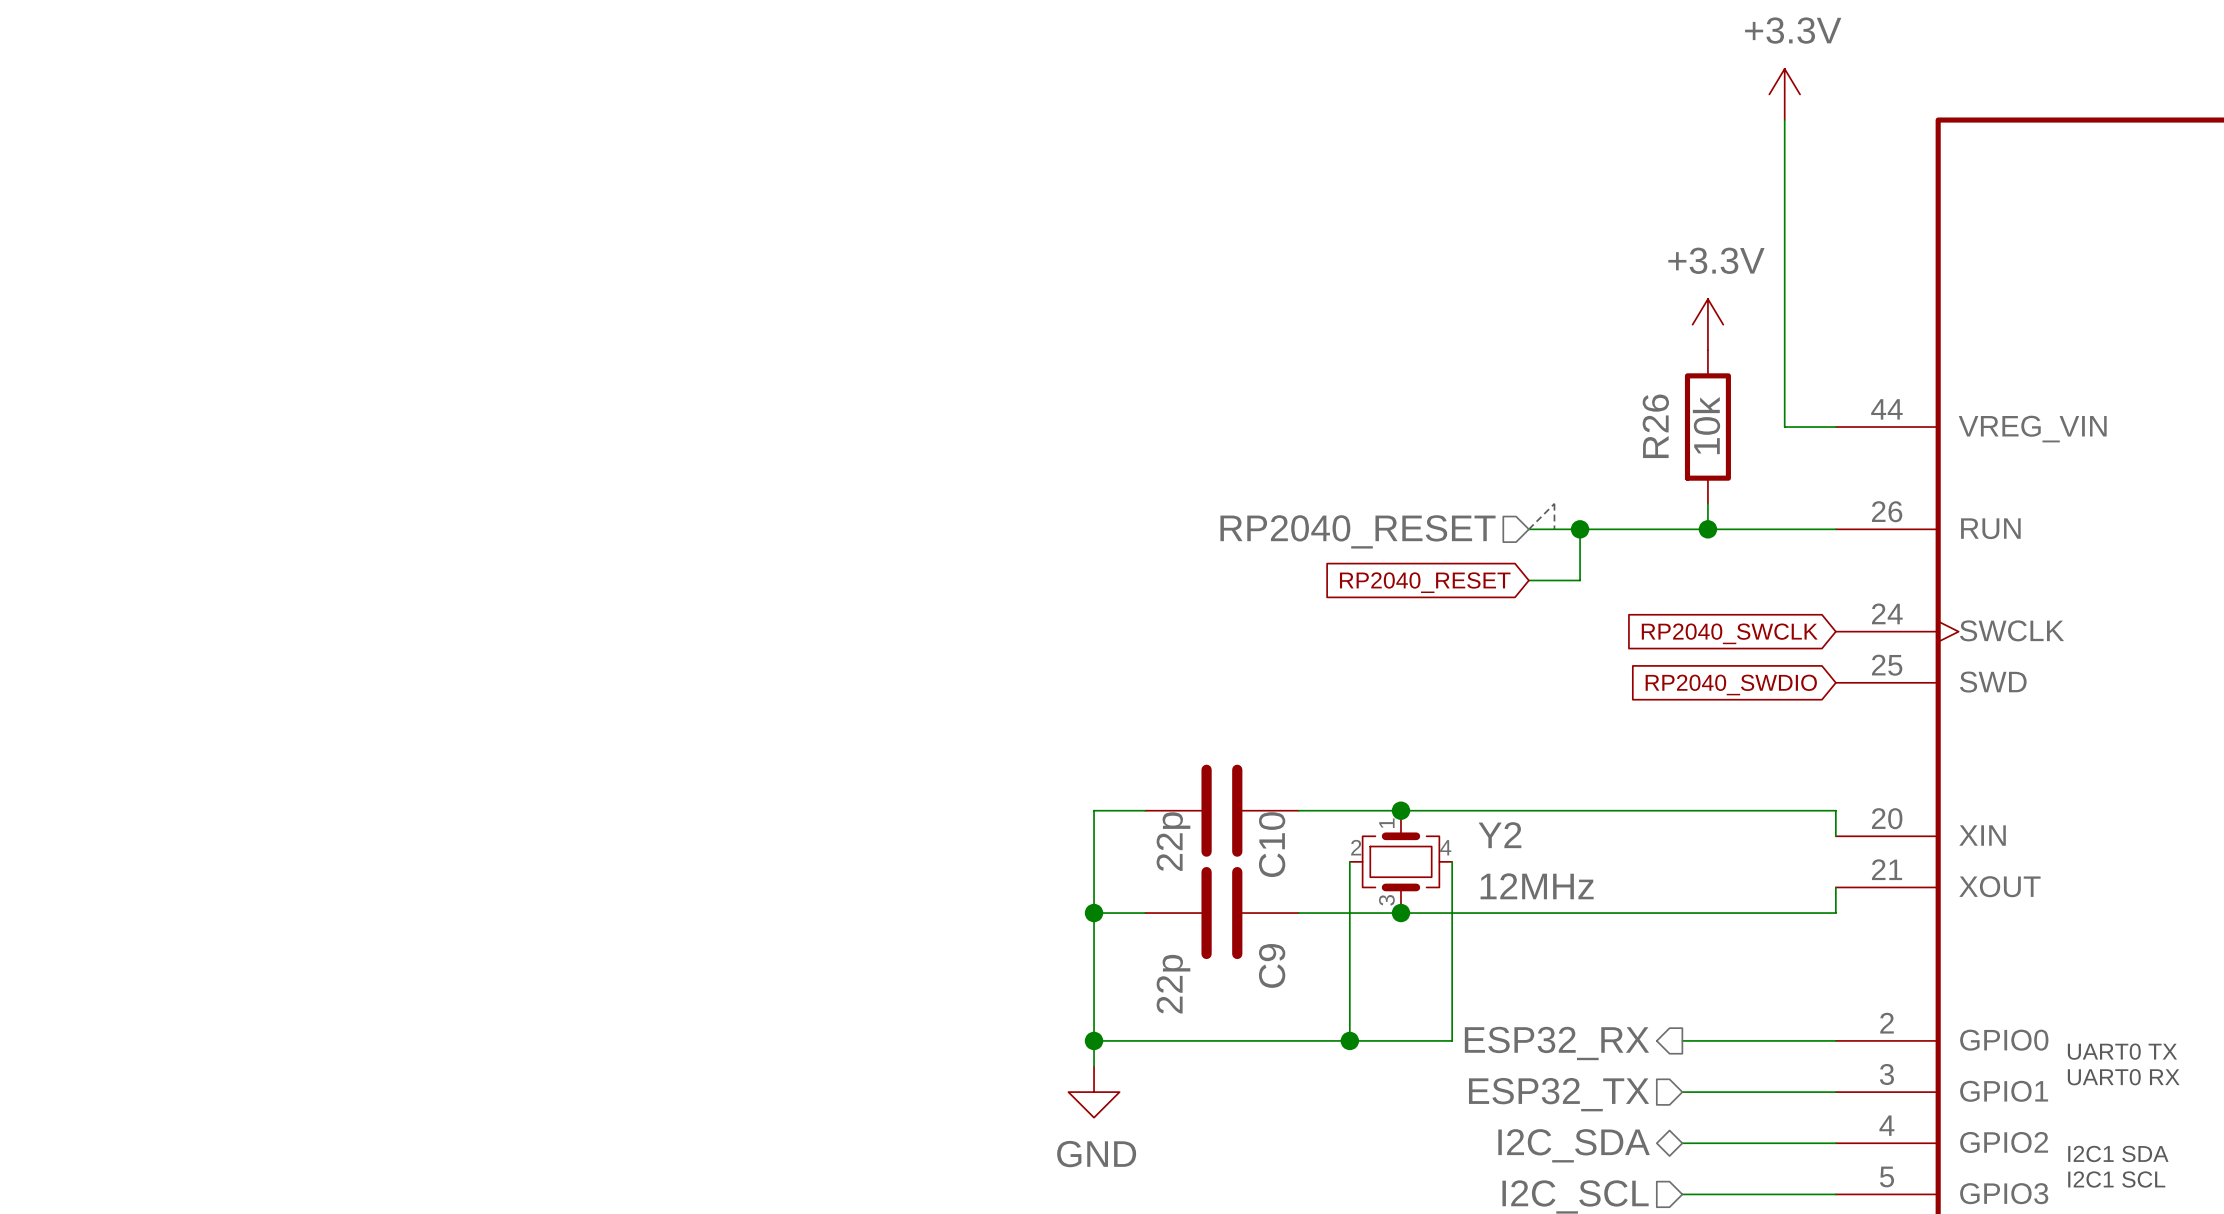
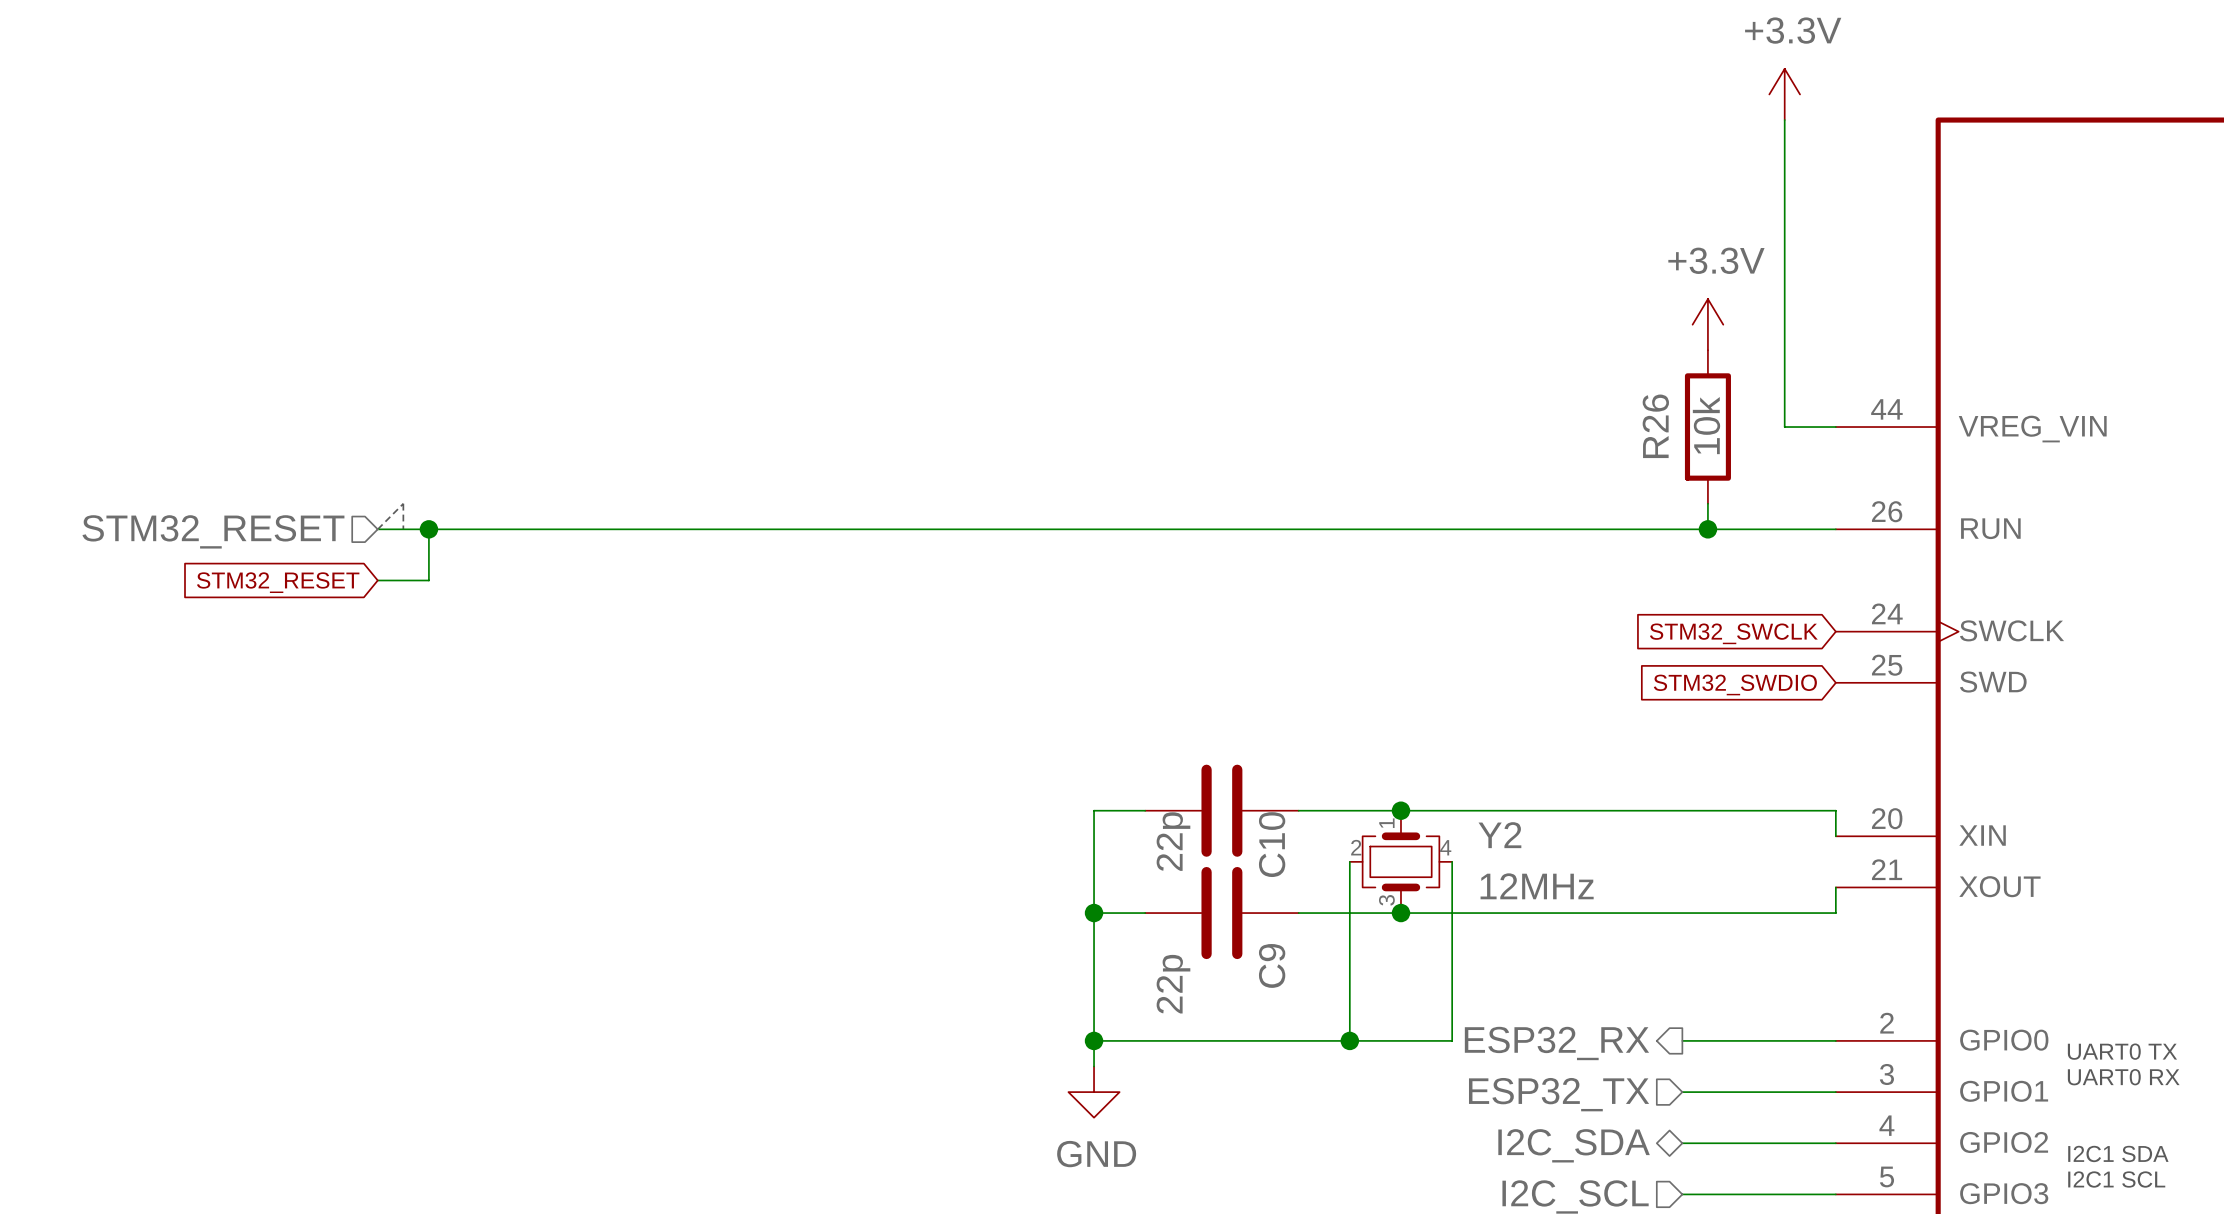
wire: none -> (377, 529) (1528, 529)
line: none -> (377, 529) (403, 503) (403, 529)
wire: none -> (428, 529) (428, 580) (377, 580)
junction: none -> (428, 529)
line: (1528, 529) (1554, 503) (1554, 529) -> none
wire: (1580, 529) (1580, 580) (1528, 580) -> none
junction: (1580, 529) -> none
hierarchical label: none -> STM32_RESET (213, 531)
hierarchical label: RP2040_RESET (1357, 531) -> none
global label: none -> STM32_RESET (278, 582)
global label: RP2040_RESET (1425, 582) -> none
global label: RP2040_SWCLK (1729, 633) -> STM32_SWCLK (1733, 633)
global label: RP2040_SWDIO (1731, 684) -> STM32_SWDIO (1735, 684)

